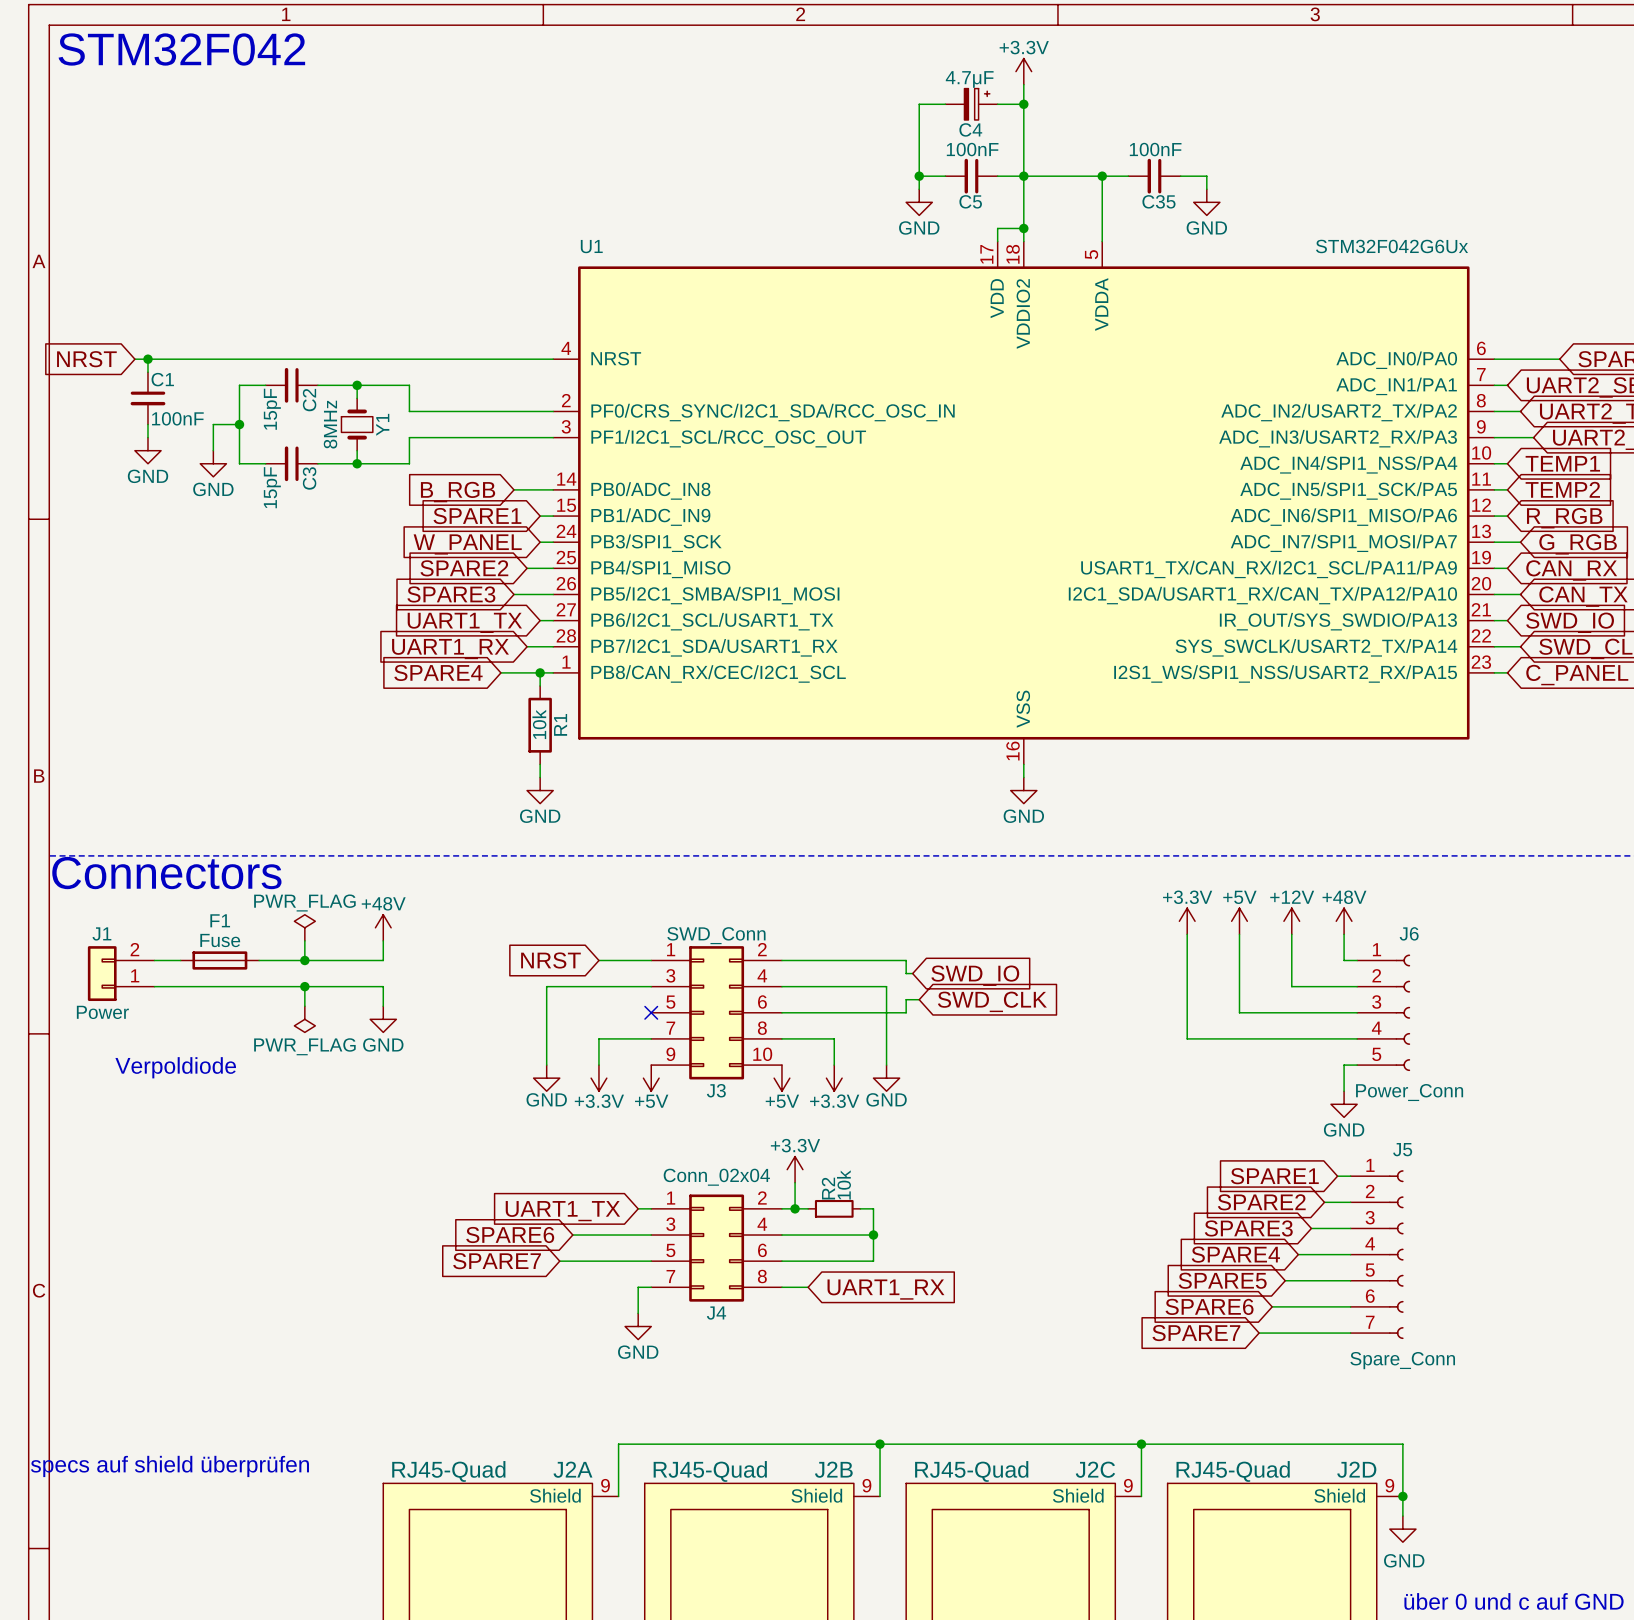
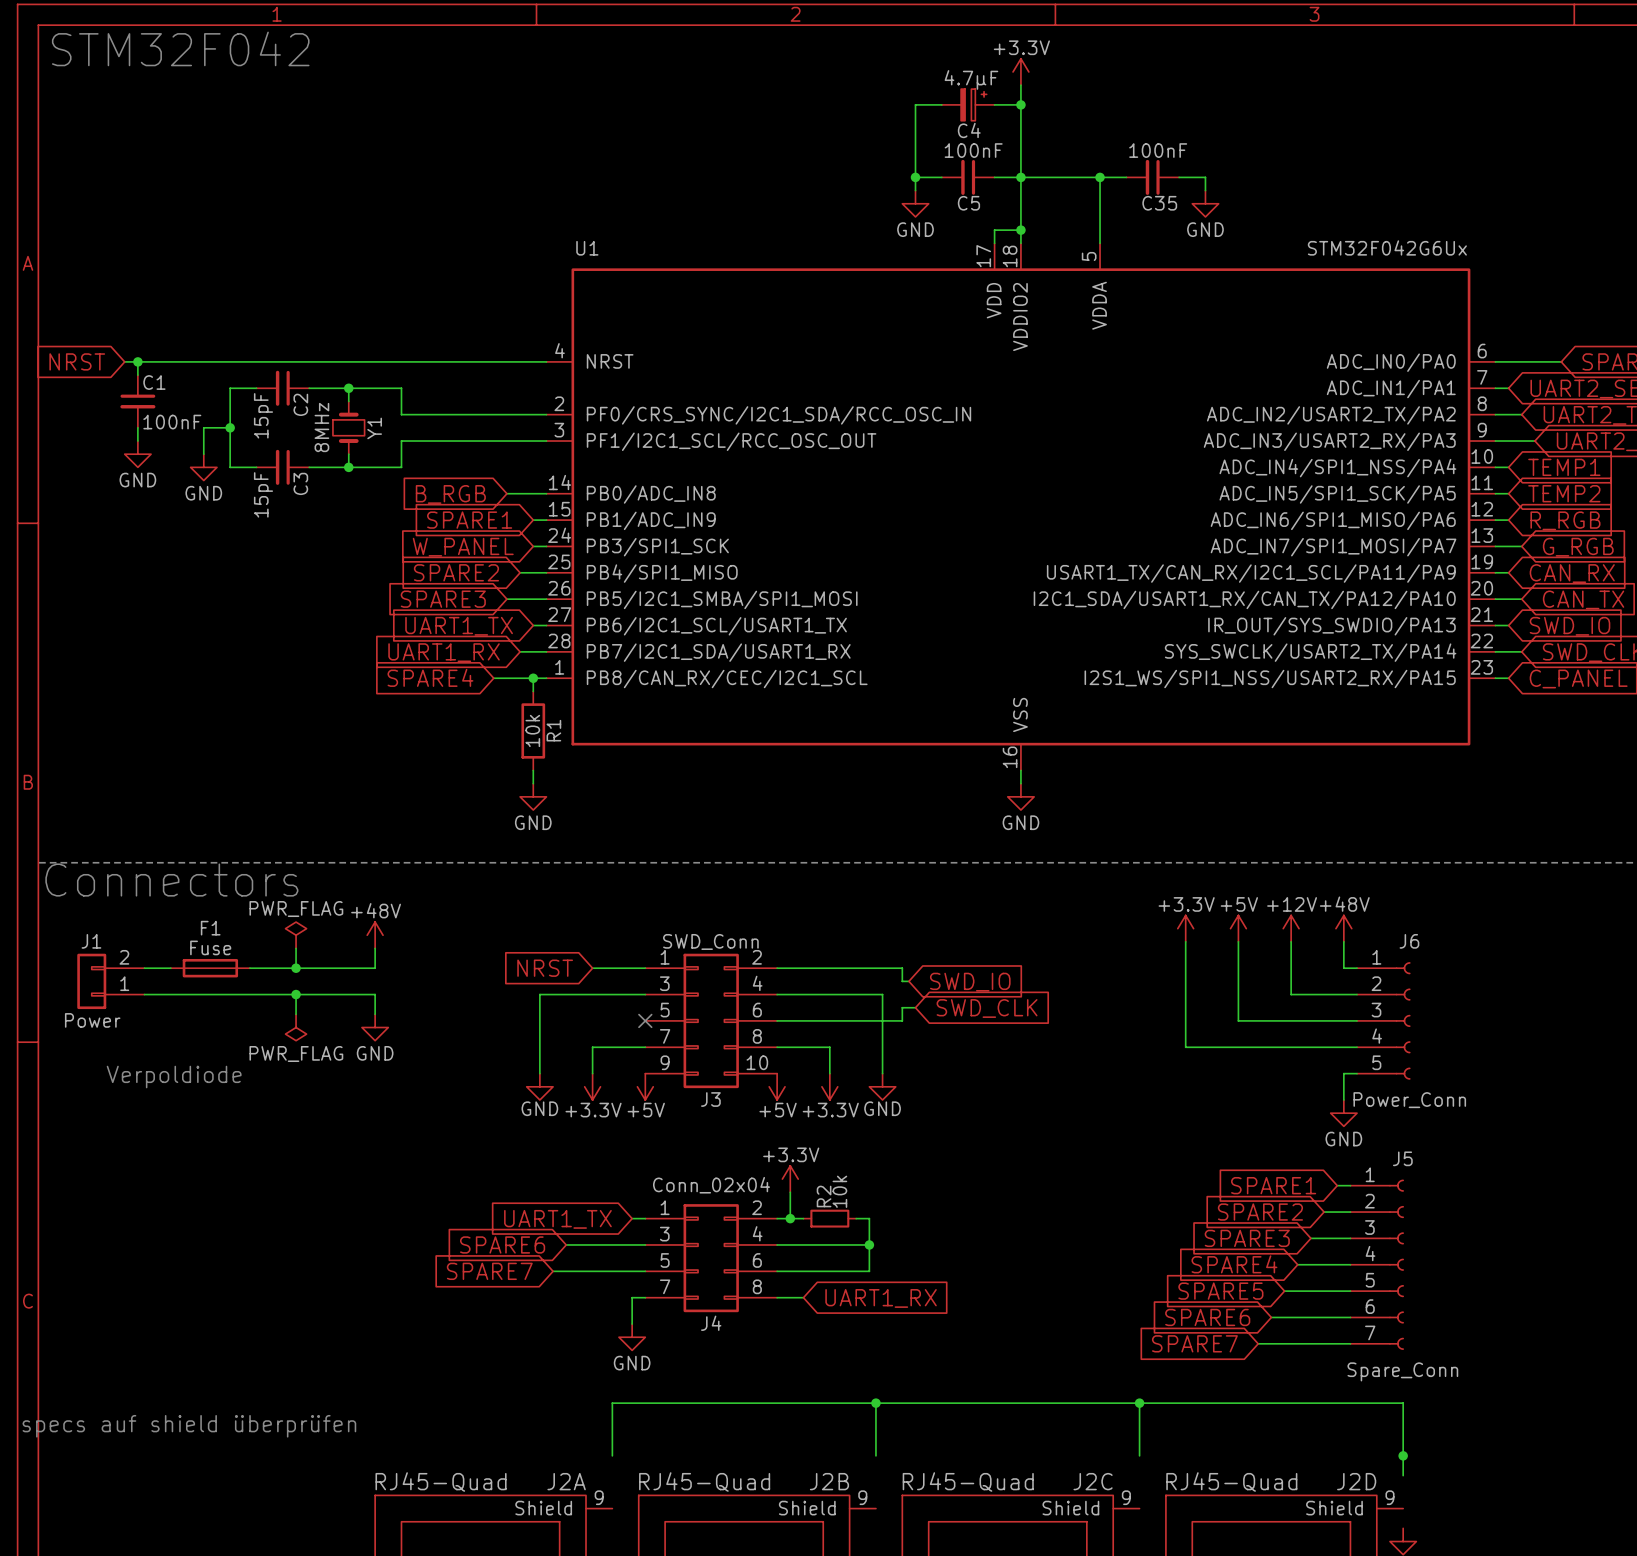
wire: (880, 1444) (880, 1496) -> (875, 1455) (875, 1403)
junction position: (880, 1444) -> (875, 1403)
wire: (1141, 1444) (1141, 1496) -> (1139, 1455) (1139, 1403)
junction position: (1141, 1444) -> (1139, 1403)
wire: (1402, 1444) (618, 1444) (618, 1496) -> (1403, 1455) (1403, 1403) (612, 1403) (612, 1455)
wire: (1402, 1463) (1402, 1516) -> none
text position: specs auf shield überprüfen (169, 1466) -> specs auf shield überprüfen (189, 1426)
junction position: (1402, 1496) -> (1403, 1455)

